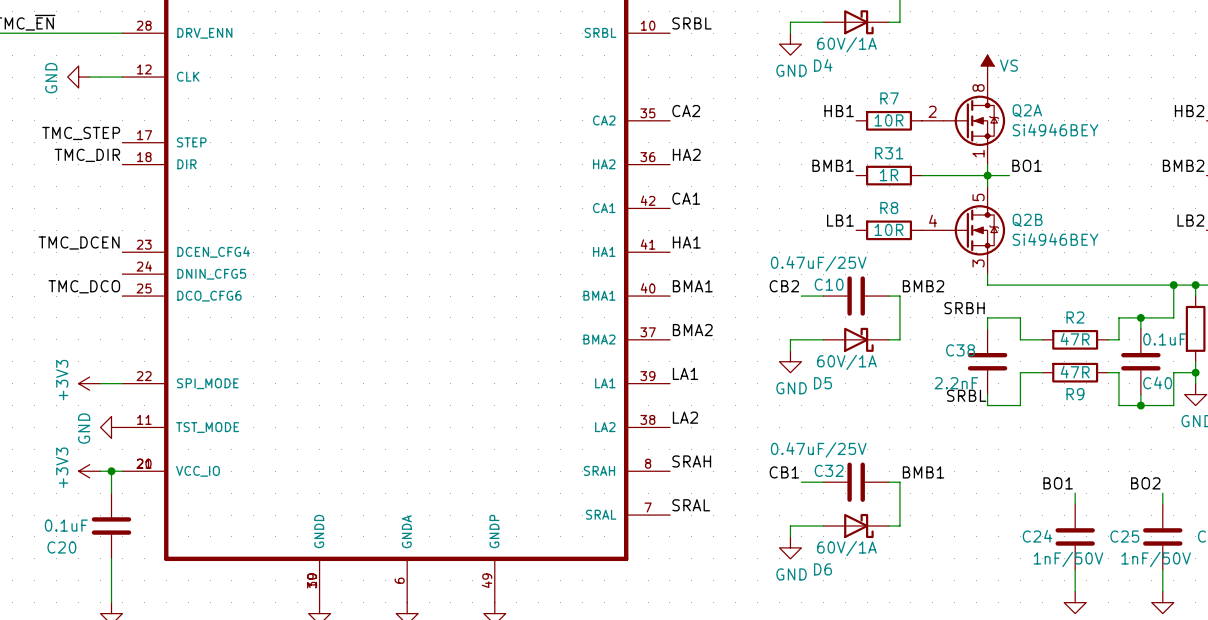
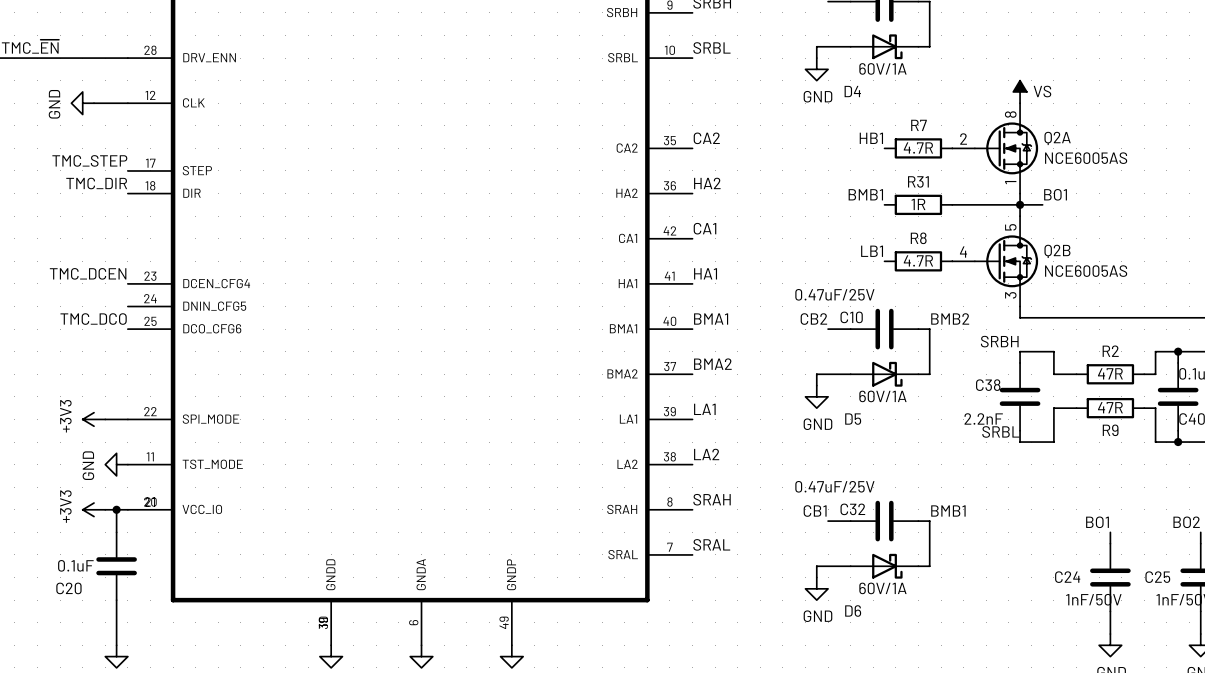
R7 value: 10R (889, 120) -> 4.7R (918, 148)
Q2A value: Si4946BEY (1055, 130) -> NCE6005AS (1086, 158)
R8 value: 10R (889, 229) -> 4.7R (918, 260)
Q2B value: Si4946BEY (1055, 239) -> NCE6005AS (1086, 271)

